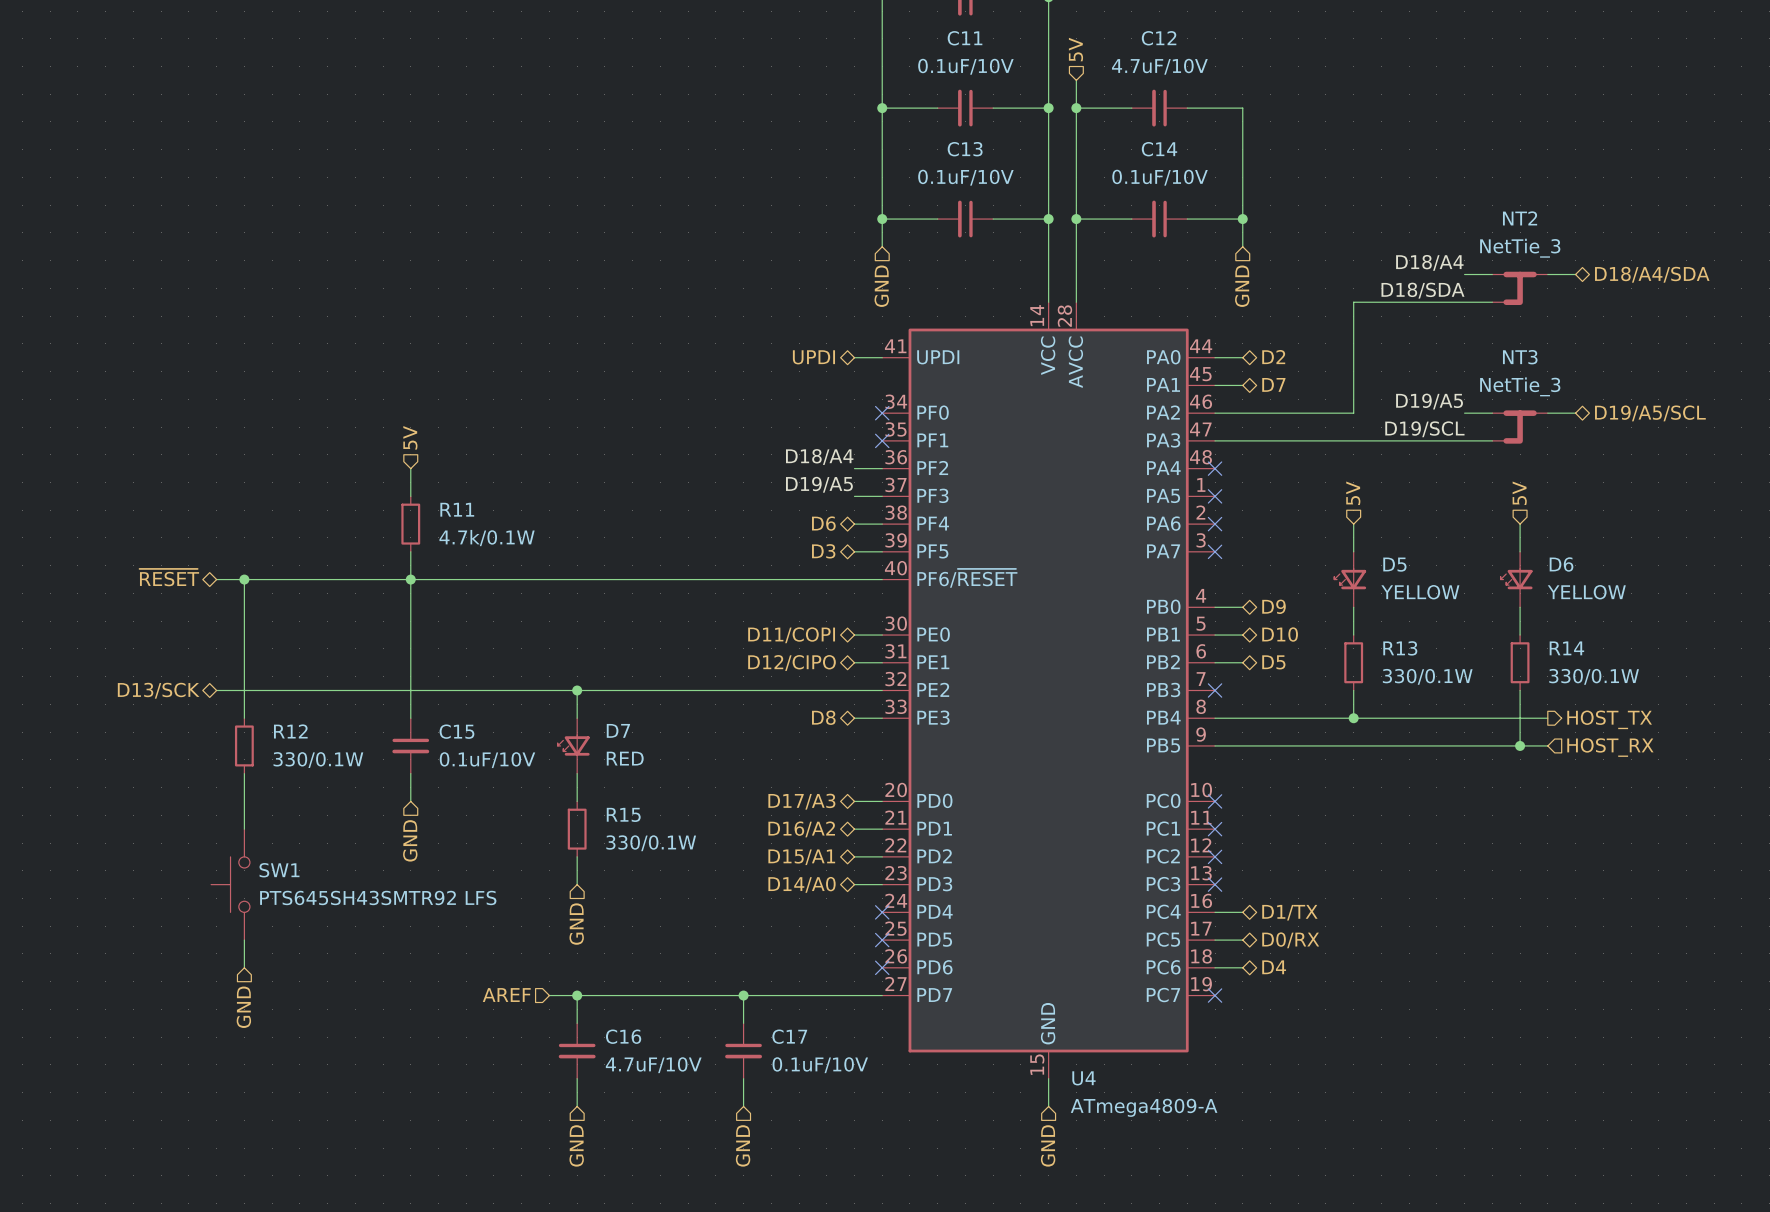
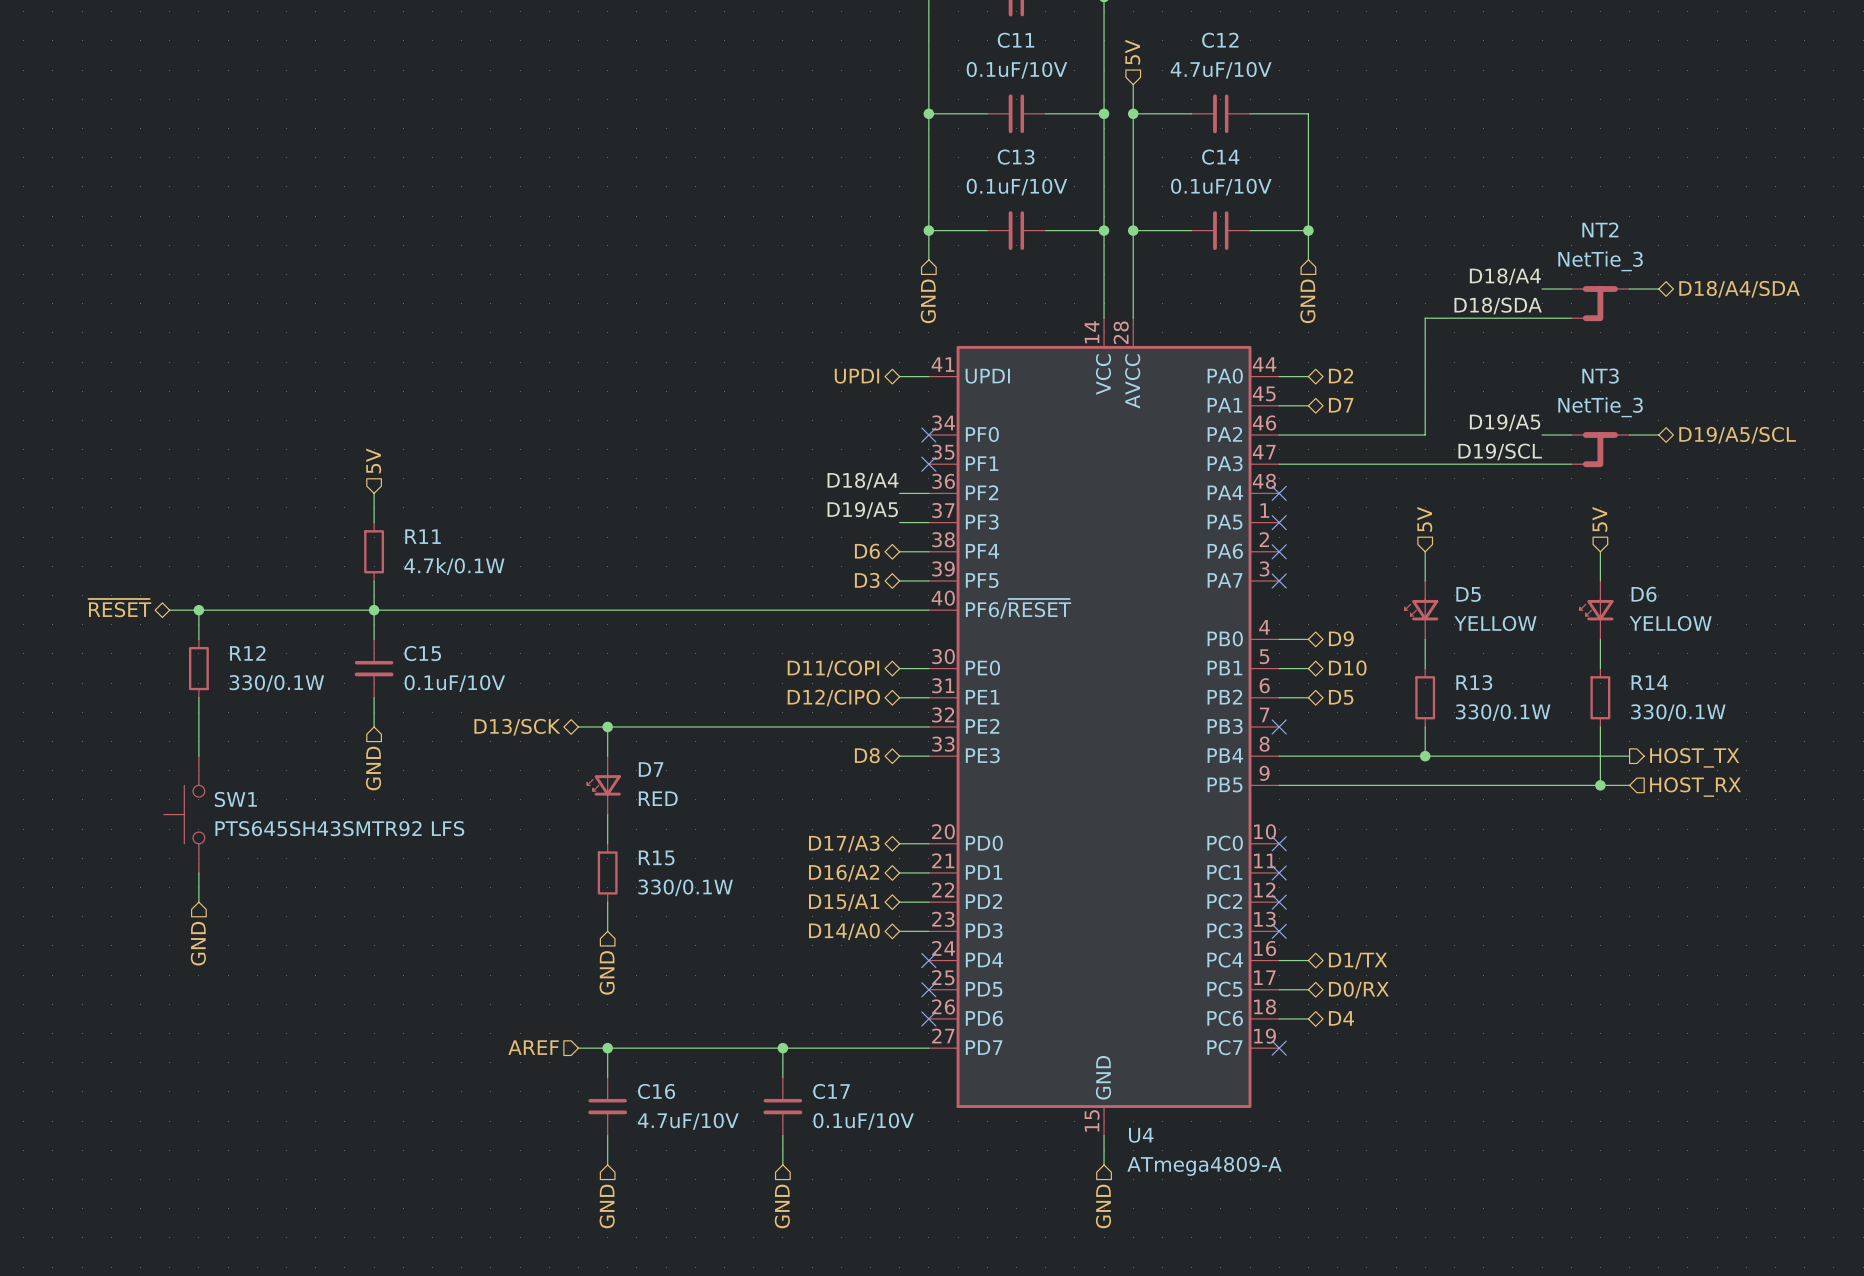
hierarchical label position: 5V (410, 437) -> 5V (373, 460)
wire: (410, 468) (410, 496) -> (374, 493) (374, 522)
R11 position: (410, 524) -> (374, 551)
wire: none -> (374, 580) (374, 639)
wire: (410, 551) (410, 718) -> none
hierarchical label position: ~{RESET} (169, 577) -> ~{RESET} (119, 608)
wire: none -> (169, 610) (228, 610)
wire: none -> (198, 610) (198, 639)
junction: none -> (198, 610)
wire: (244, 579) (244, 718) -> none
junction: (244, 579) -> none
junction: none -> (374, 610)
junction: (410, 579) -> none
hierarchical label: D13/SCK (158, 690) -> none
wire: (216, 690) (549, 690) -> none
hierarchical label: none -> D13/SCK (517, 727)
hierarchical label: none -> GND (373, 768)
R12 position: (244, 745) -> (198, 668)
C15 position: (410, 745) -> (374, 668)
wire: (244, 773) (244, 829) -> (198, 697) (198, 756)
wire: (410, 773) (410, 801) -> (374, 697) (374, 726)
hierarchical label: GND (410, 840) -> none
SW1 position: (230, 884) -> (184, 814)
hierarchical label: none -> GND (198, 943)
wire: (244, 940) (244, 967) -> (198, 872) (198, 902)
hierarchical label: GND (243, 1007) -> none

